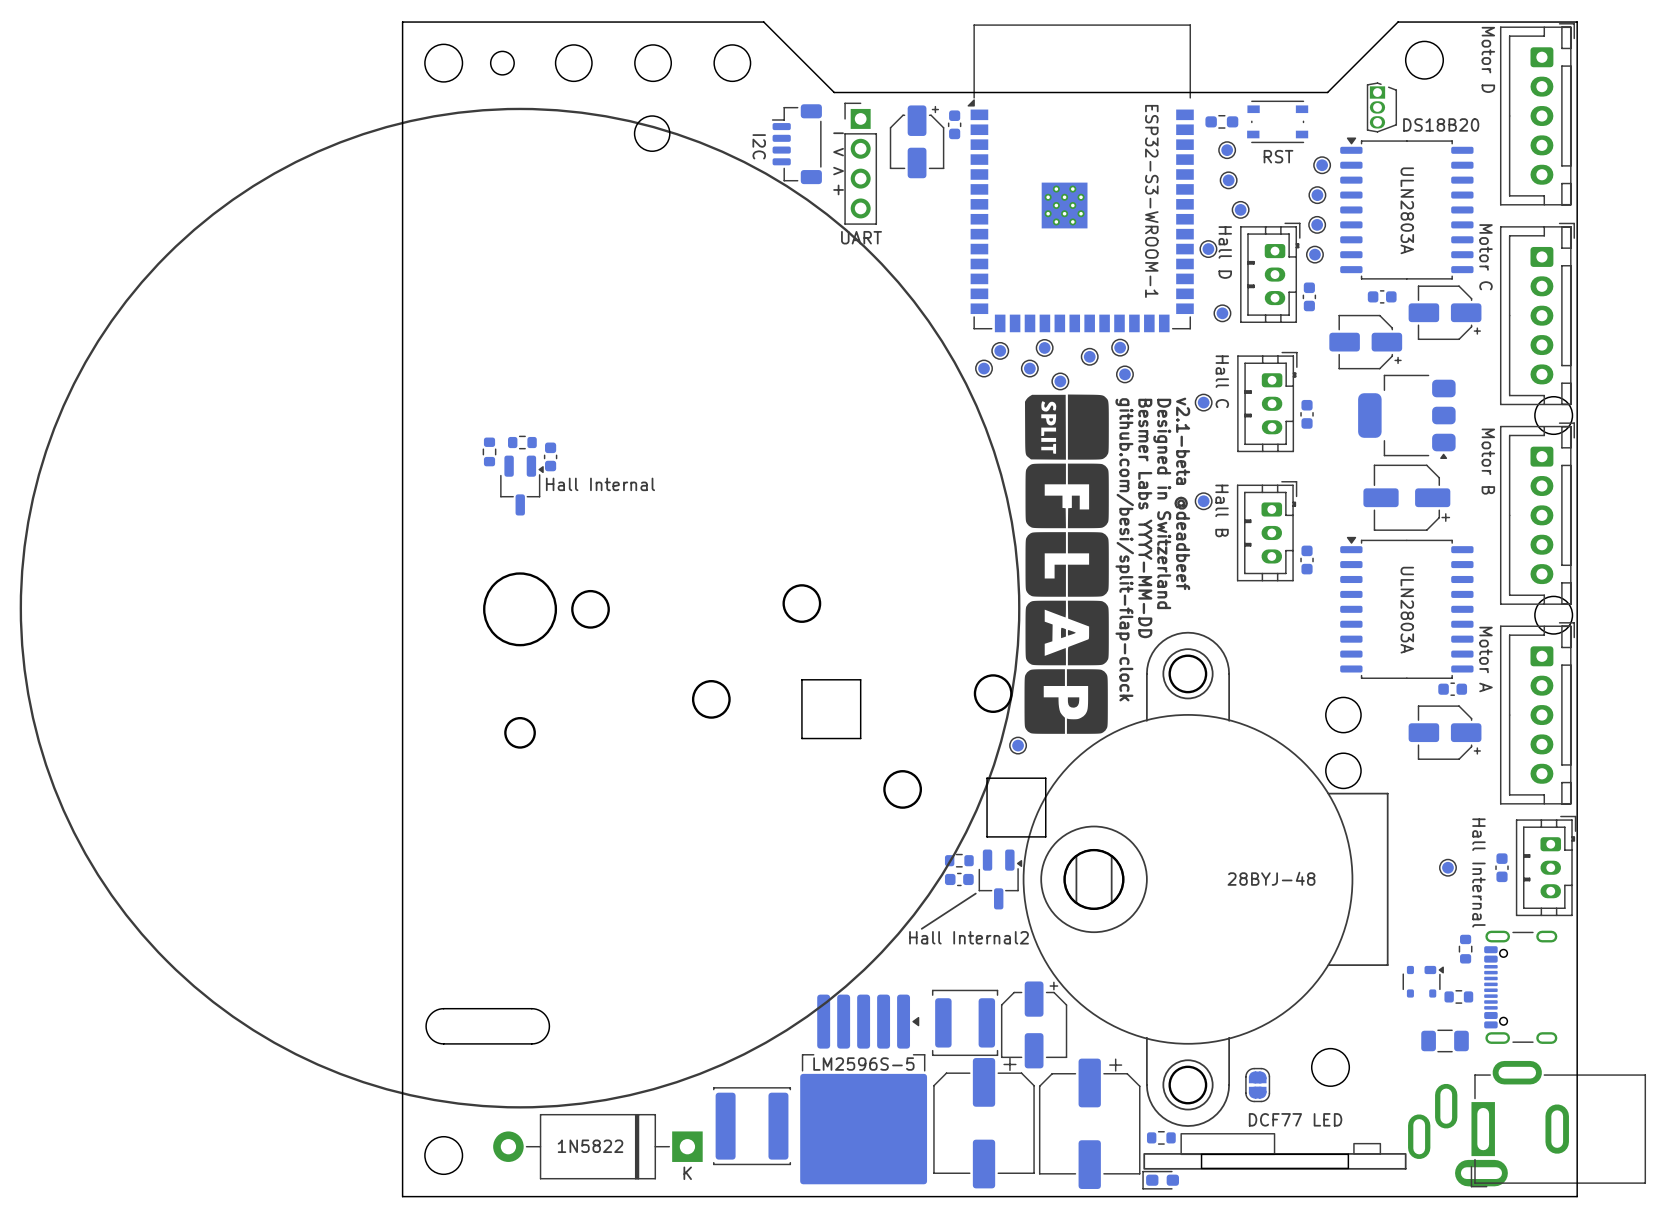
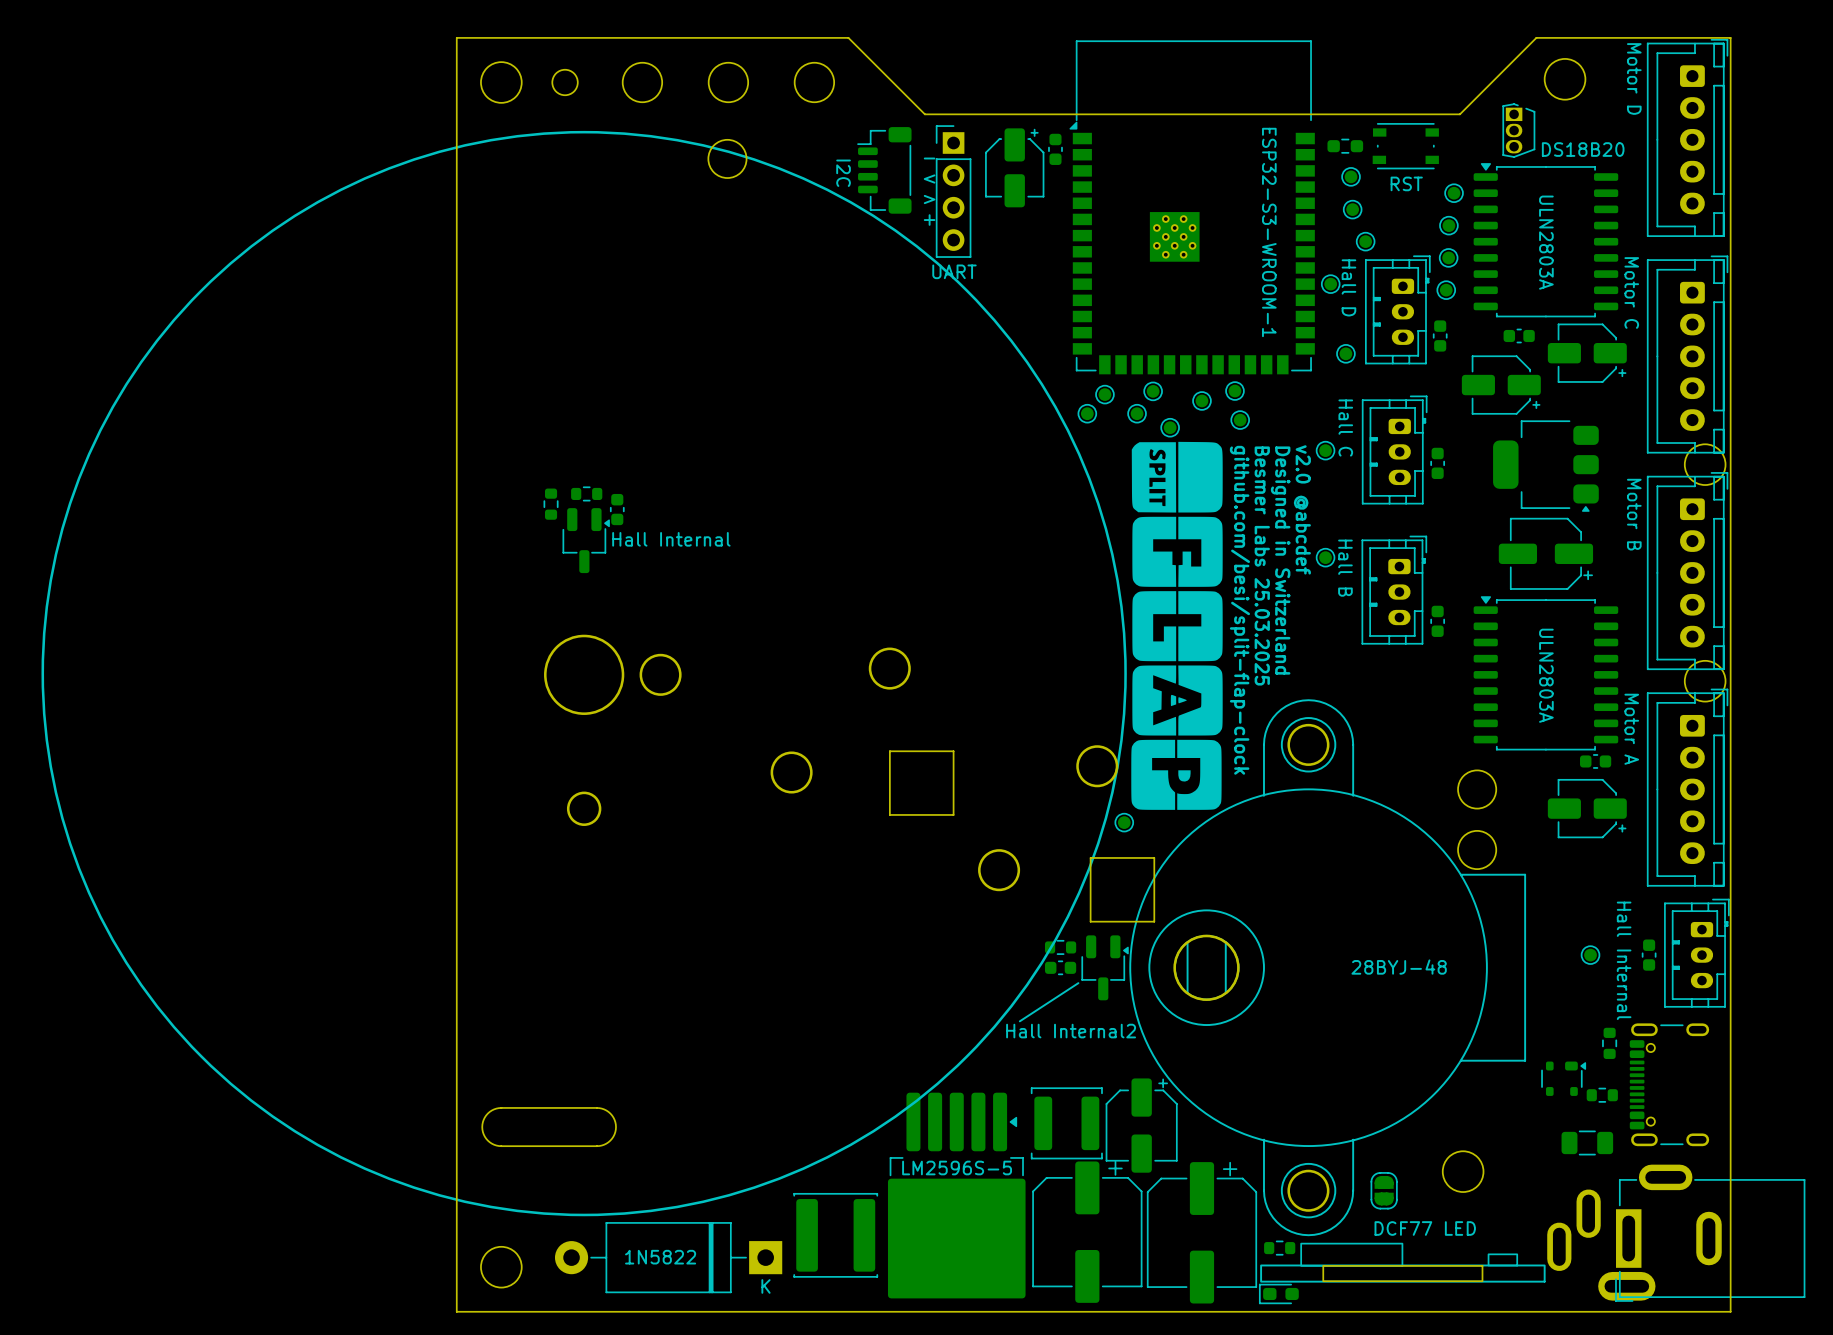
text: v2.1-beta @deadbeef (1182, 493) -> v2.0 @abcdef (1302, 509)
text: Besmer Labs YYYY-MM-DD (1145, 518) -> Besmer Labs 25.03.2025 (1262, 565)

